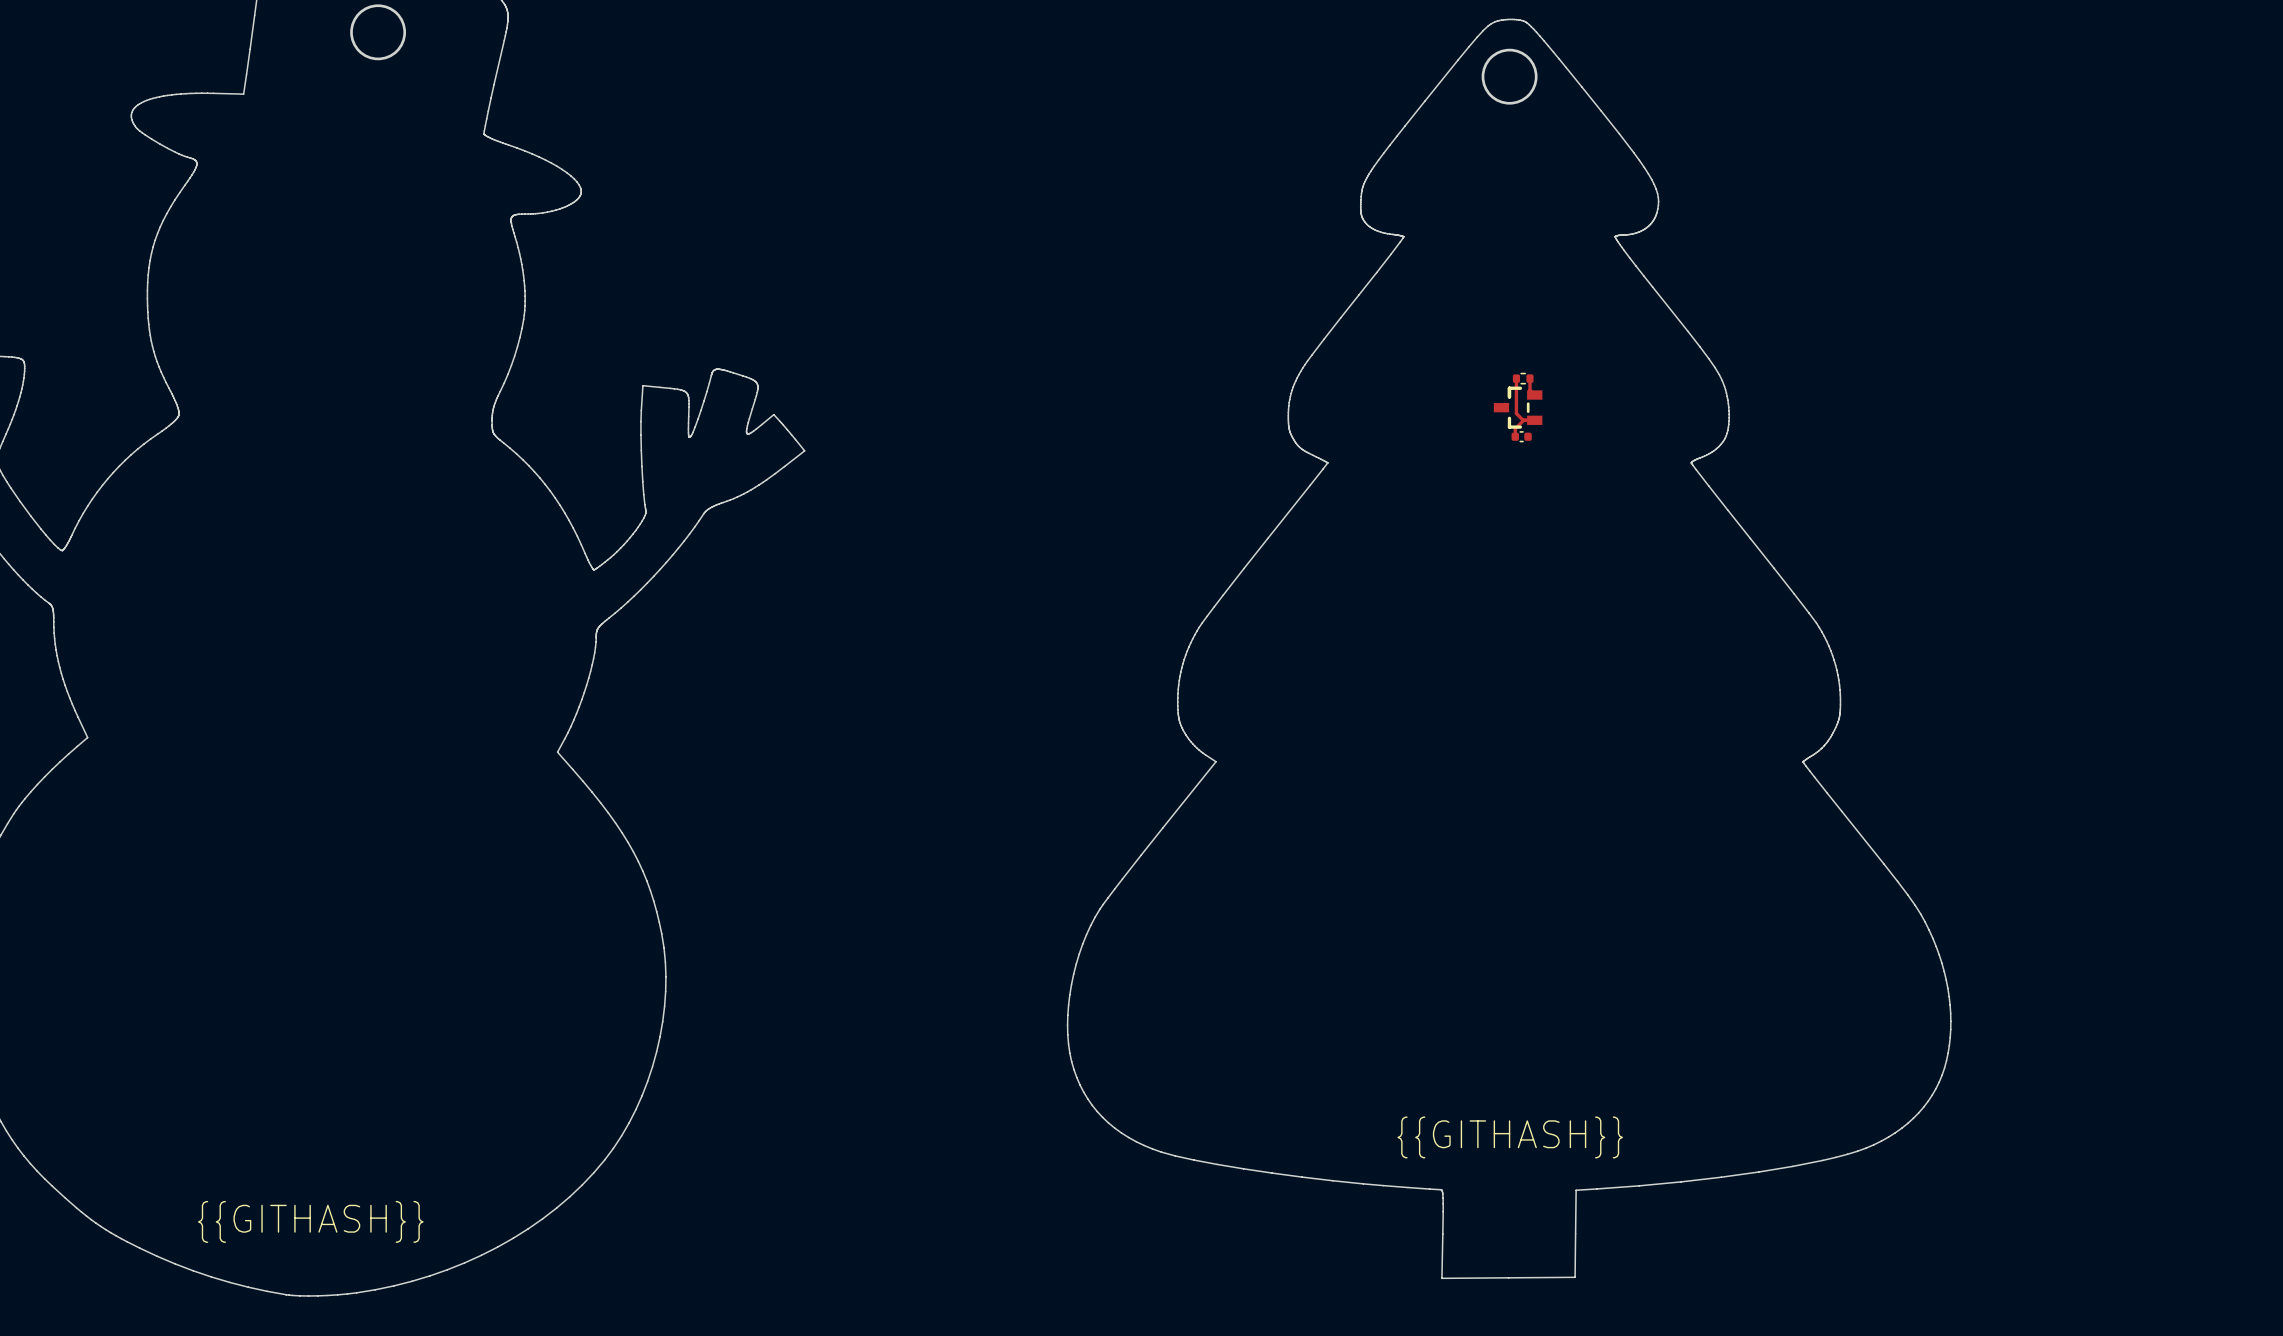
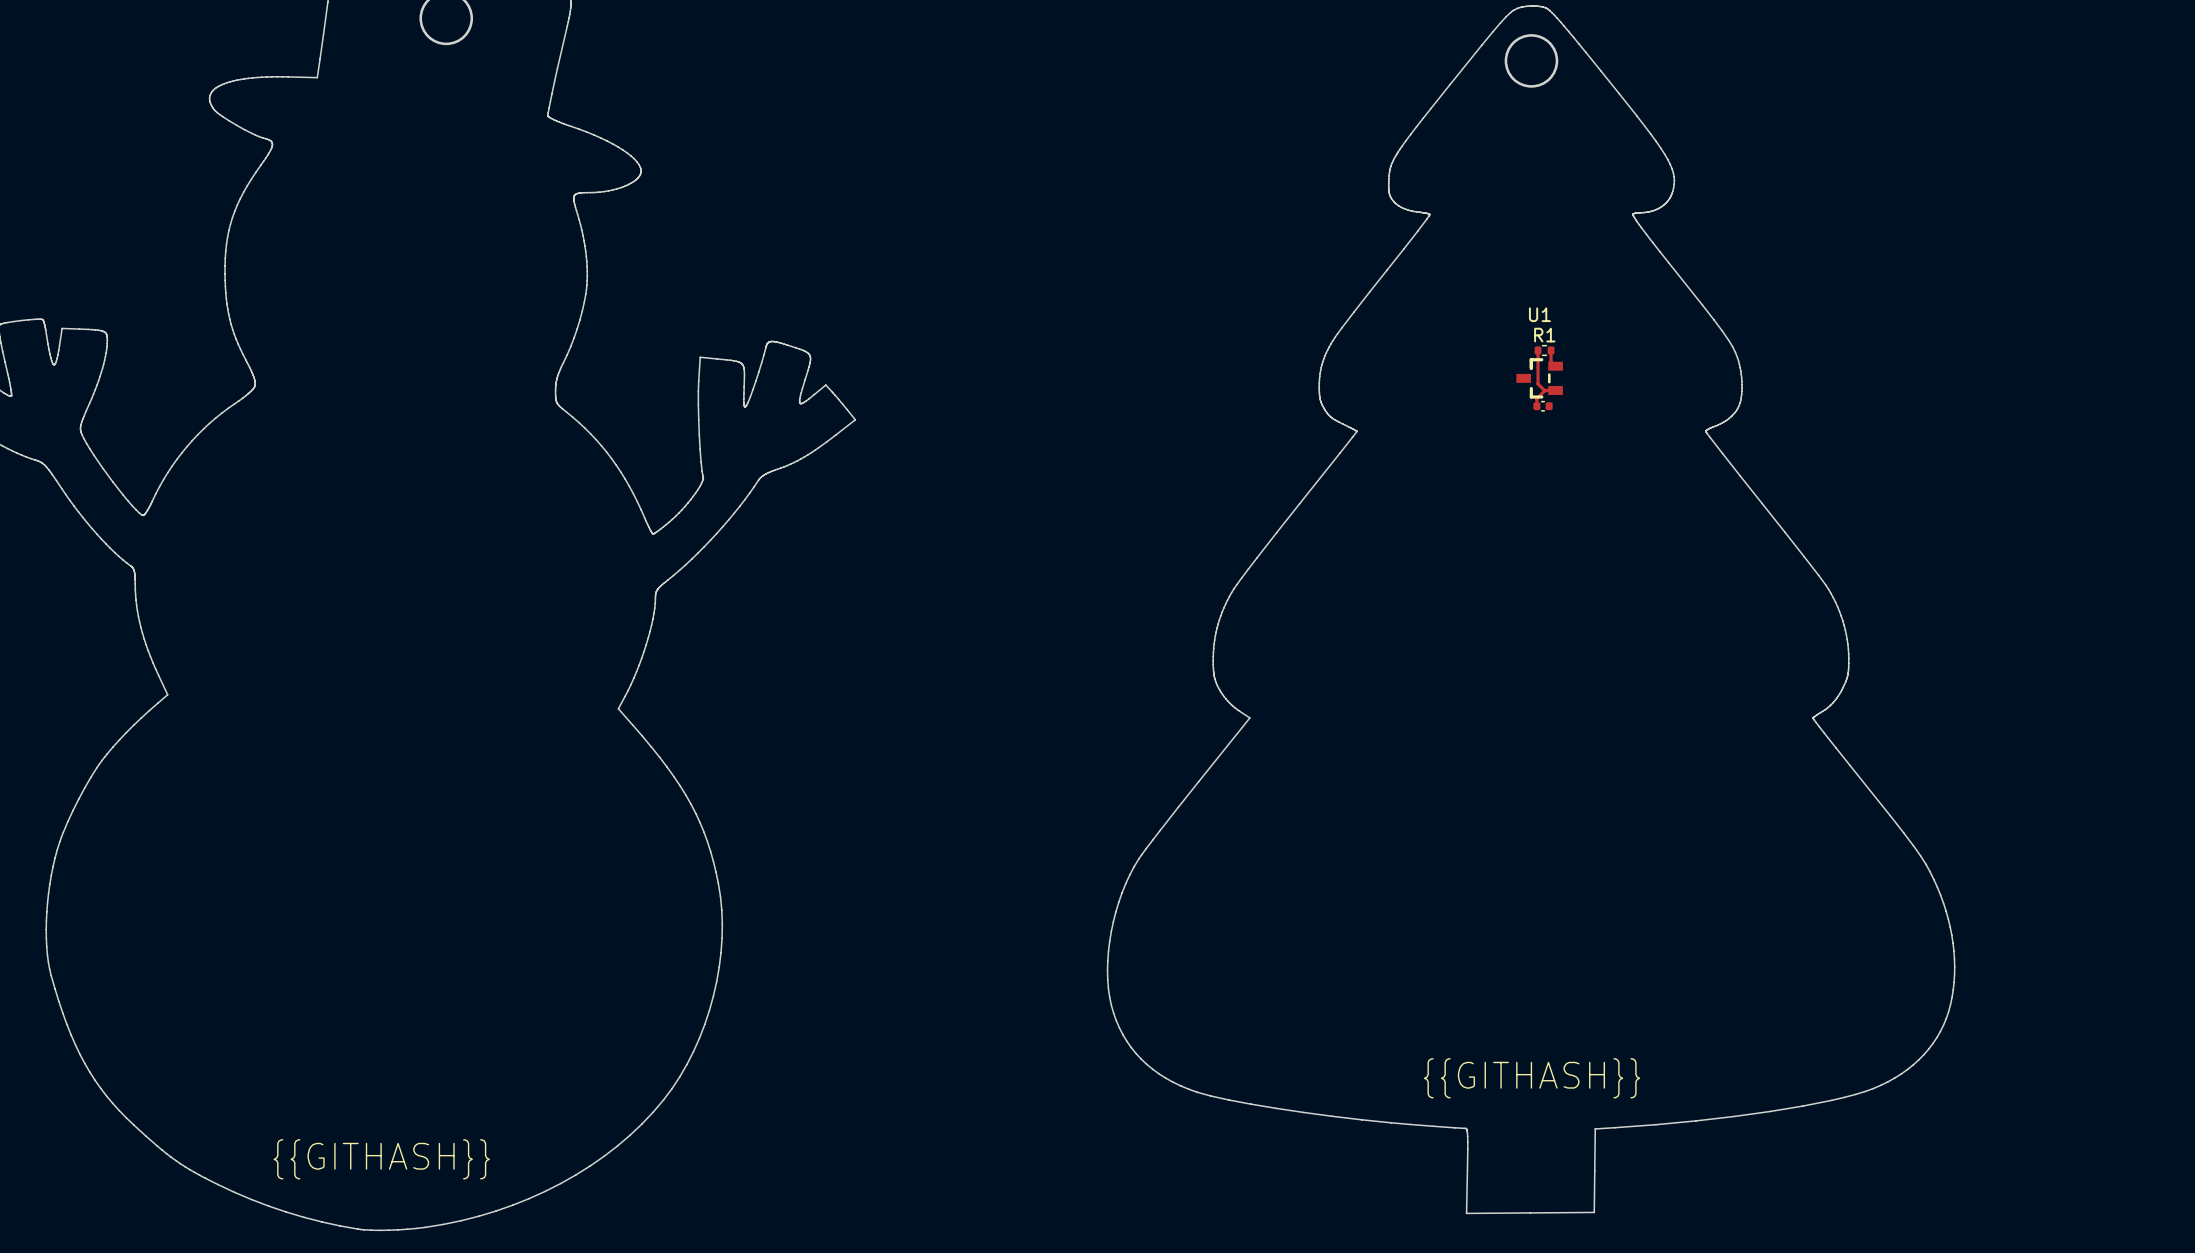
U1 name: none -> U1 (1539, 314)
R1 name: none -> R1 (1544, 335)

